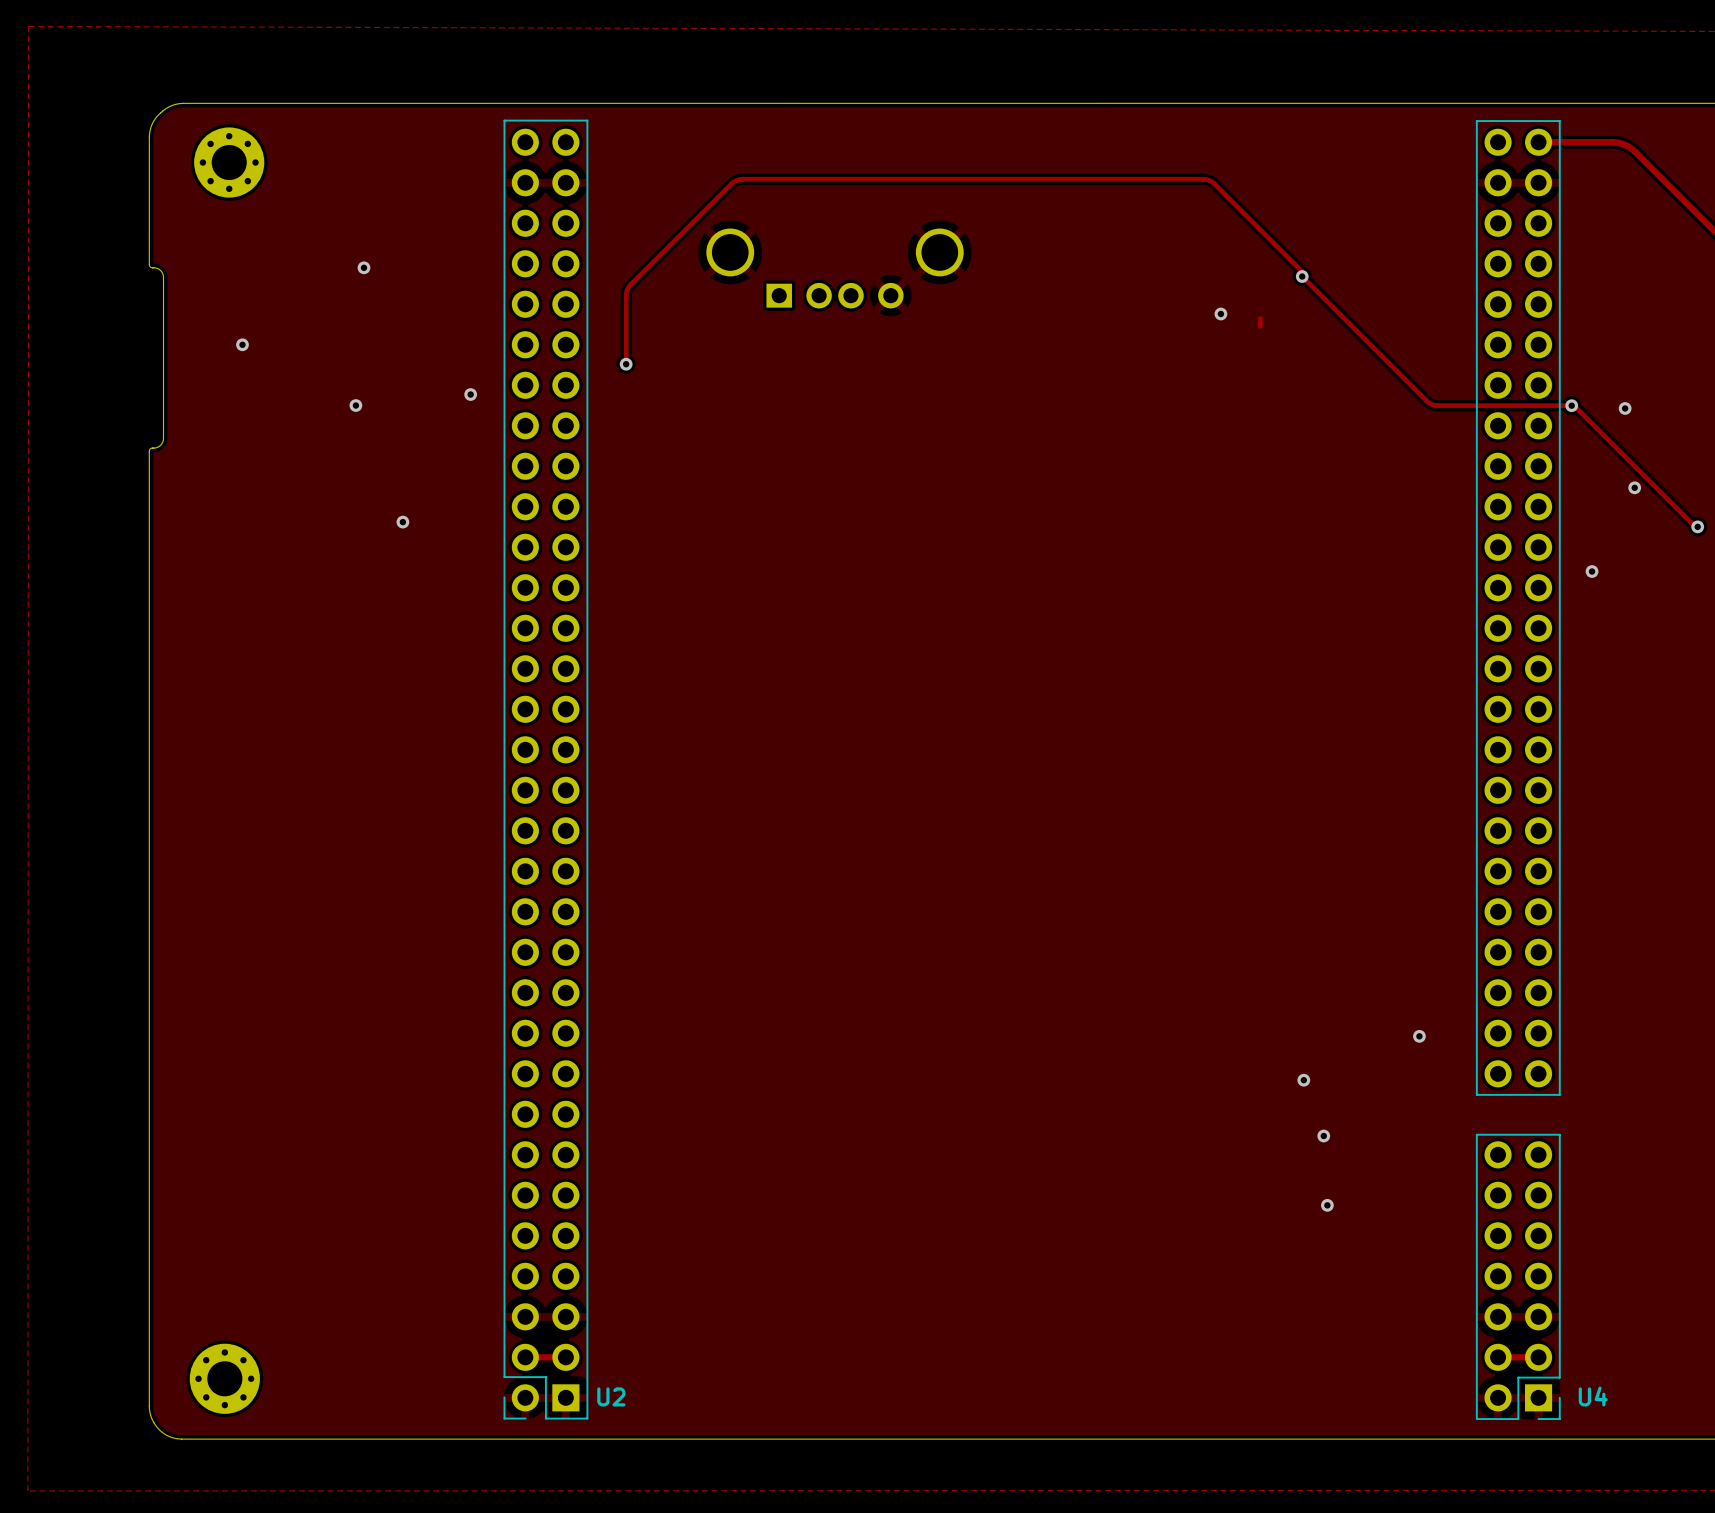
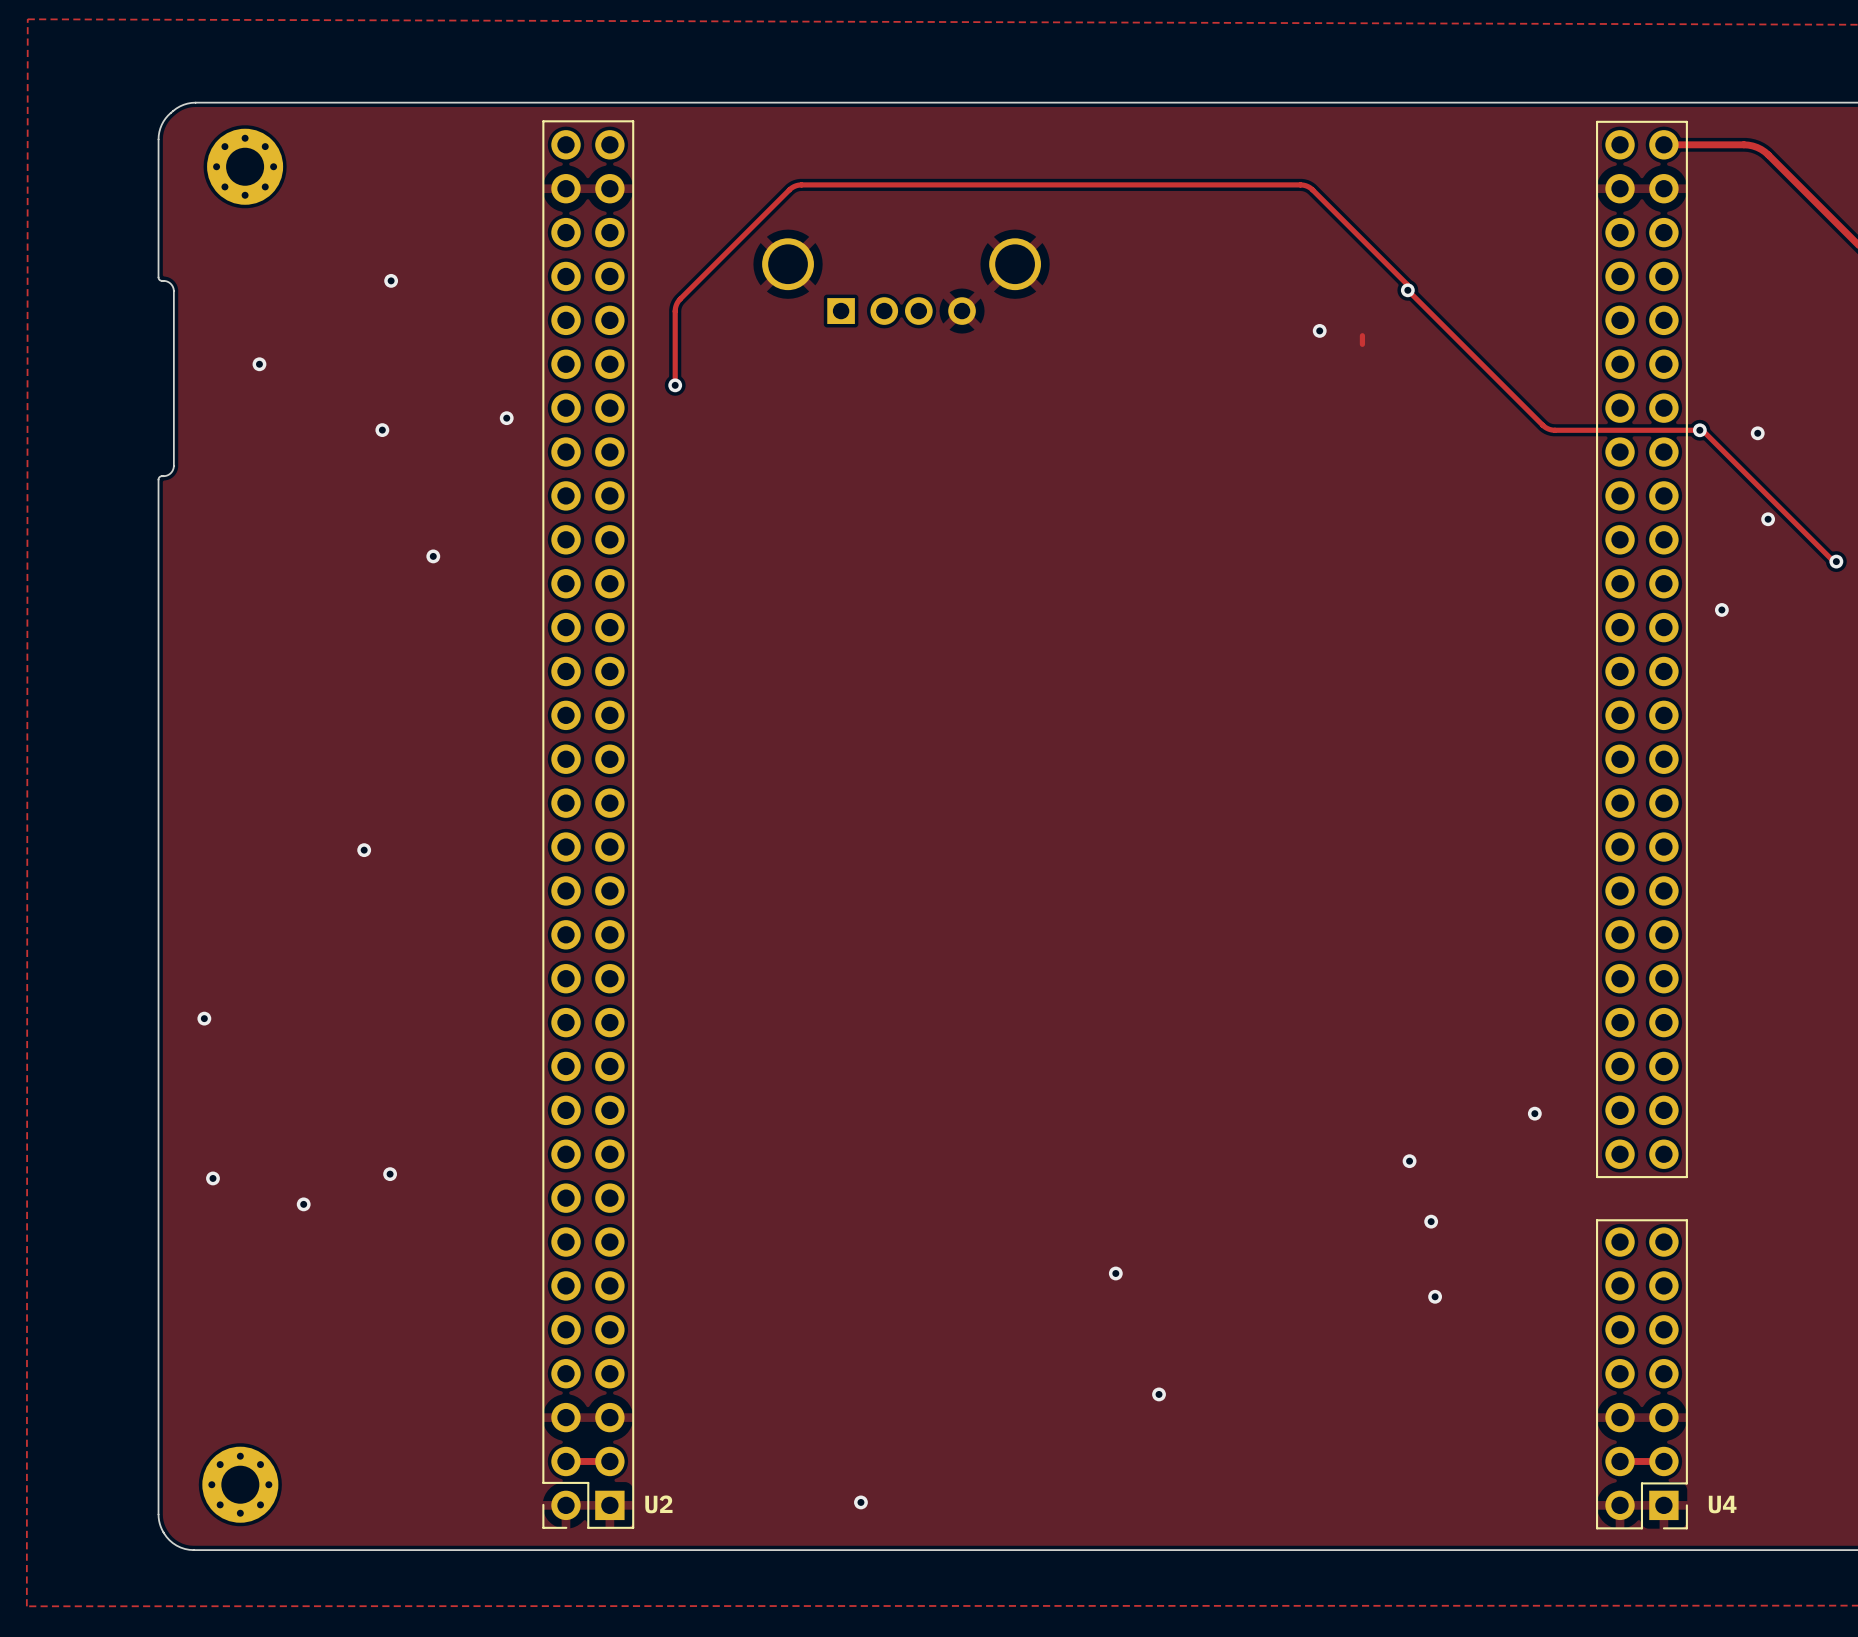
via: none -> (364, 850)
via: none -> (204, 1018)
via: none -> (390, 1174)
via: none -> (212, 1178)
via: none -> (303, 1204)
via: none -> (1115, 1273)
via: none -> (1159, 1394)
via: none -> (860, 1502)

